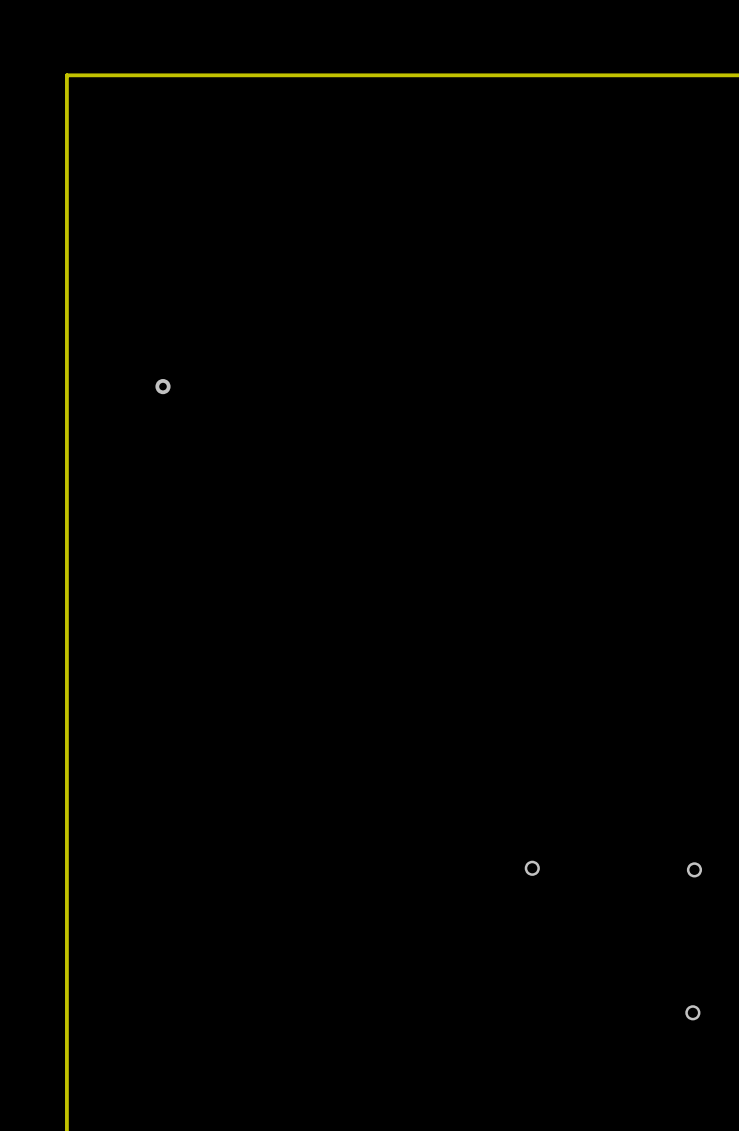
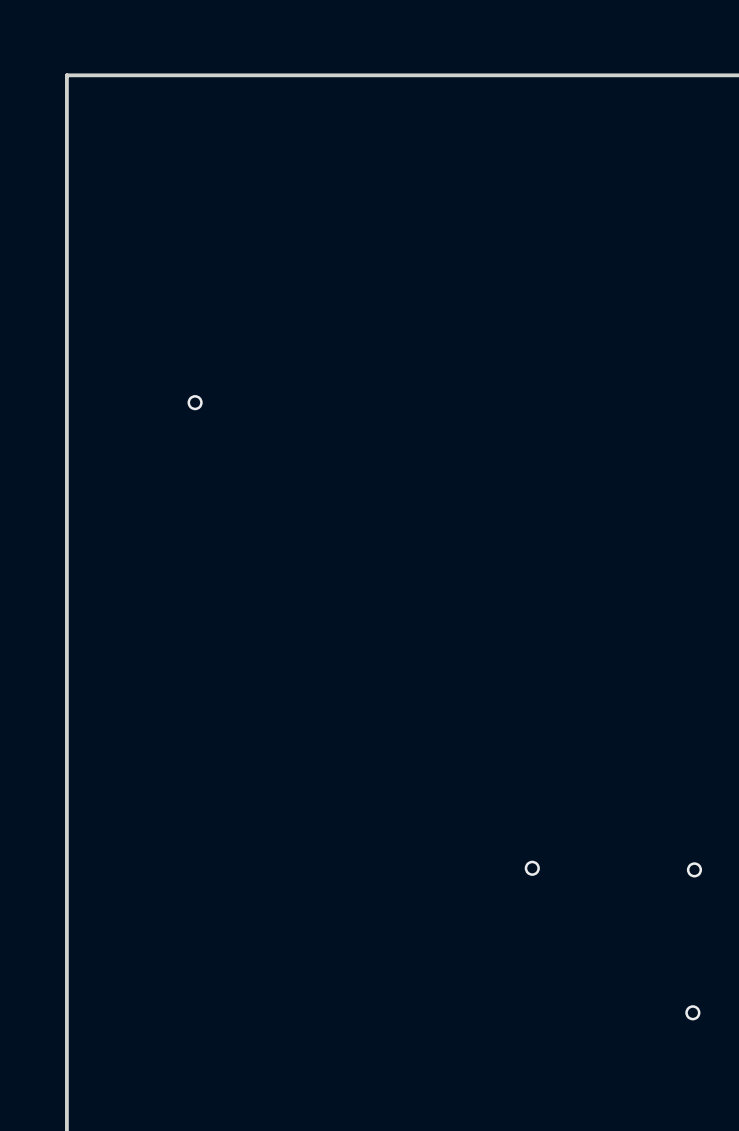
via: (163, 386) -> none
via: none -> (195, 402)

